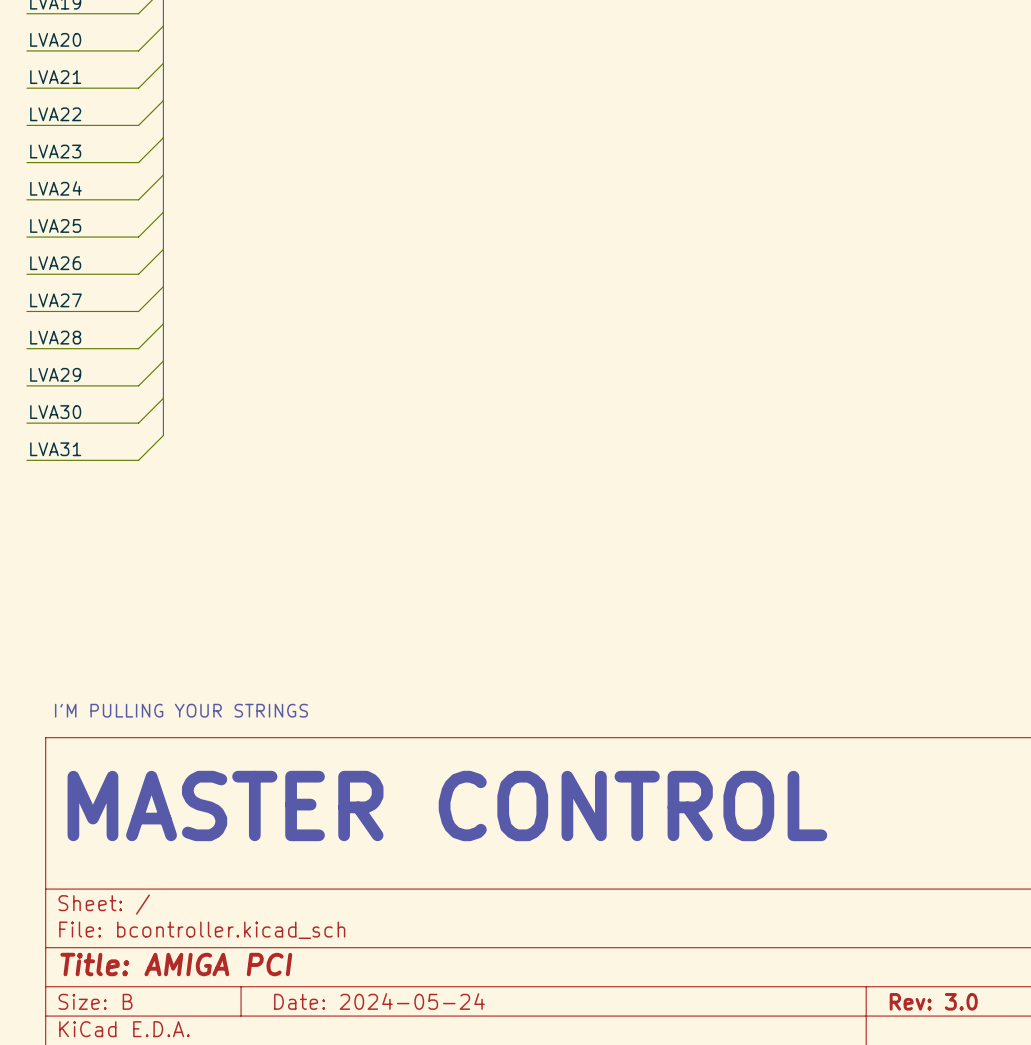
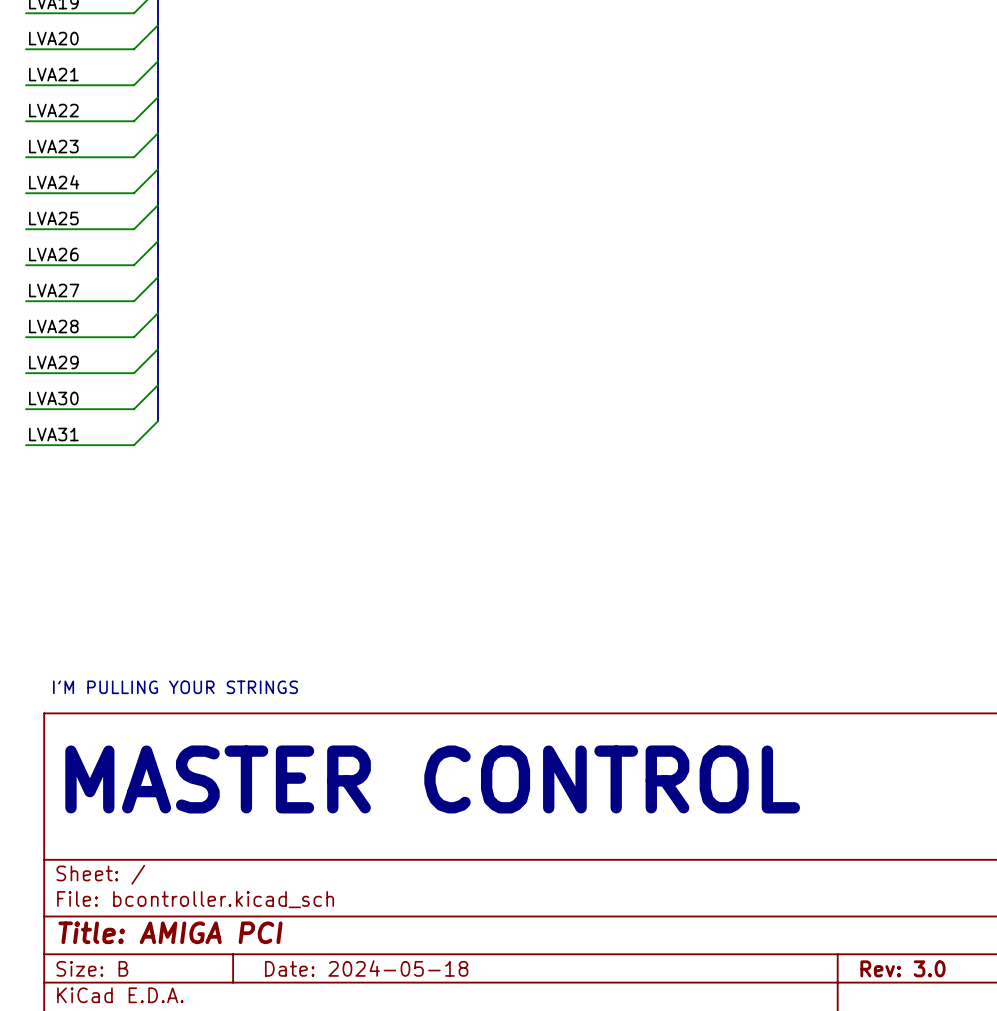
title block: Date: 2024-05-24 (379, 1001) -> Date: 2024-05-18 (366, 968)

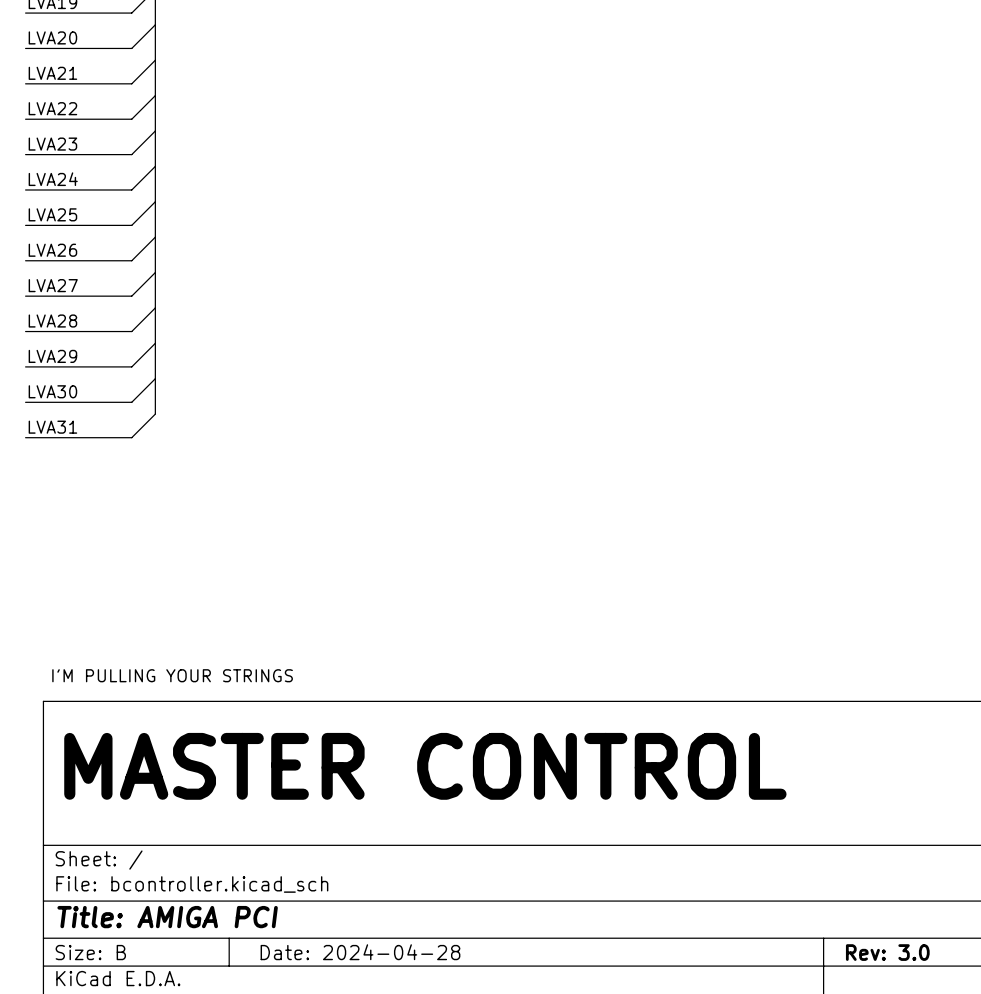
title block: Date: 2024-05-18 (366, 968) -> Date: 2024-04-28 (360, 952)

